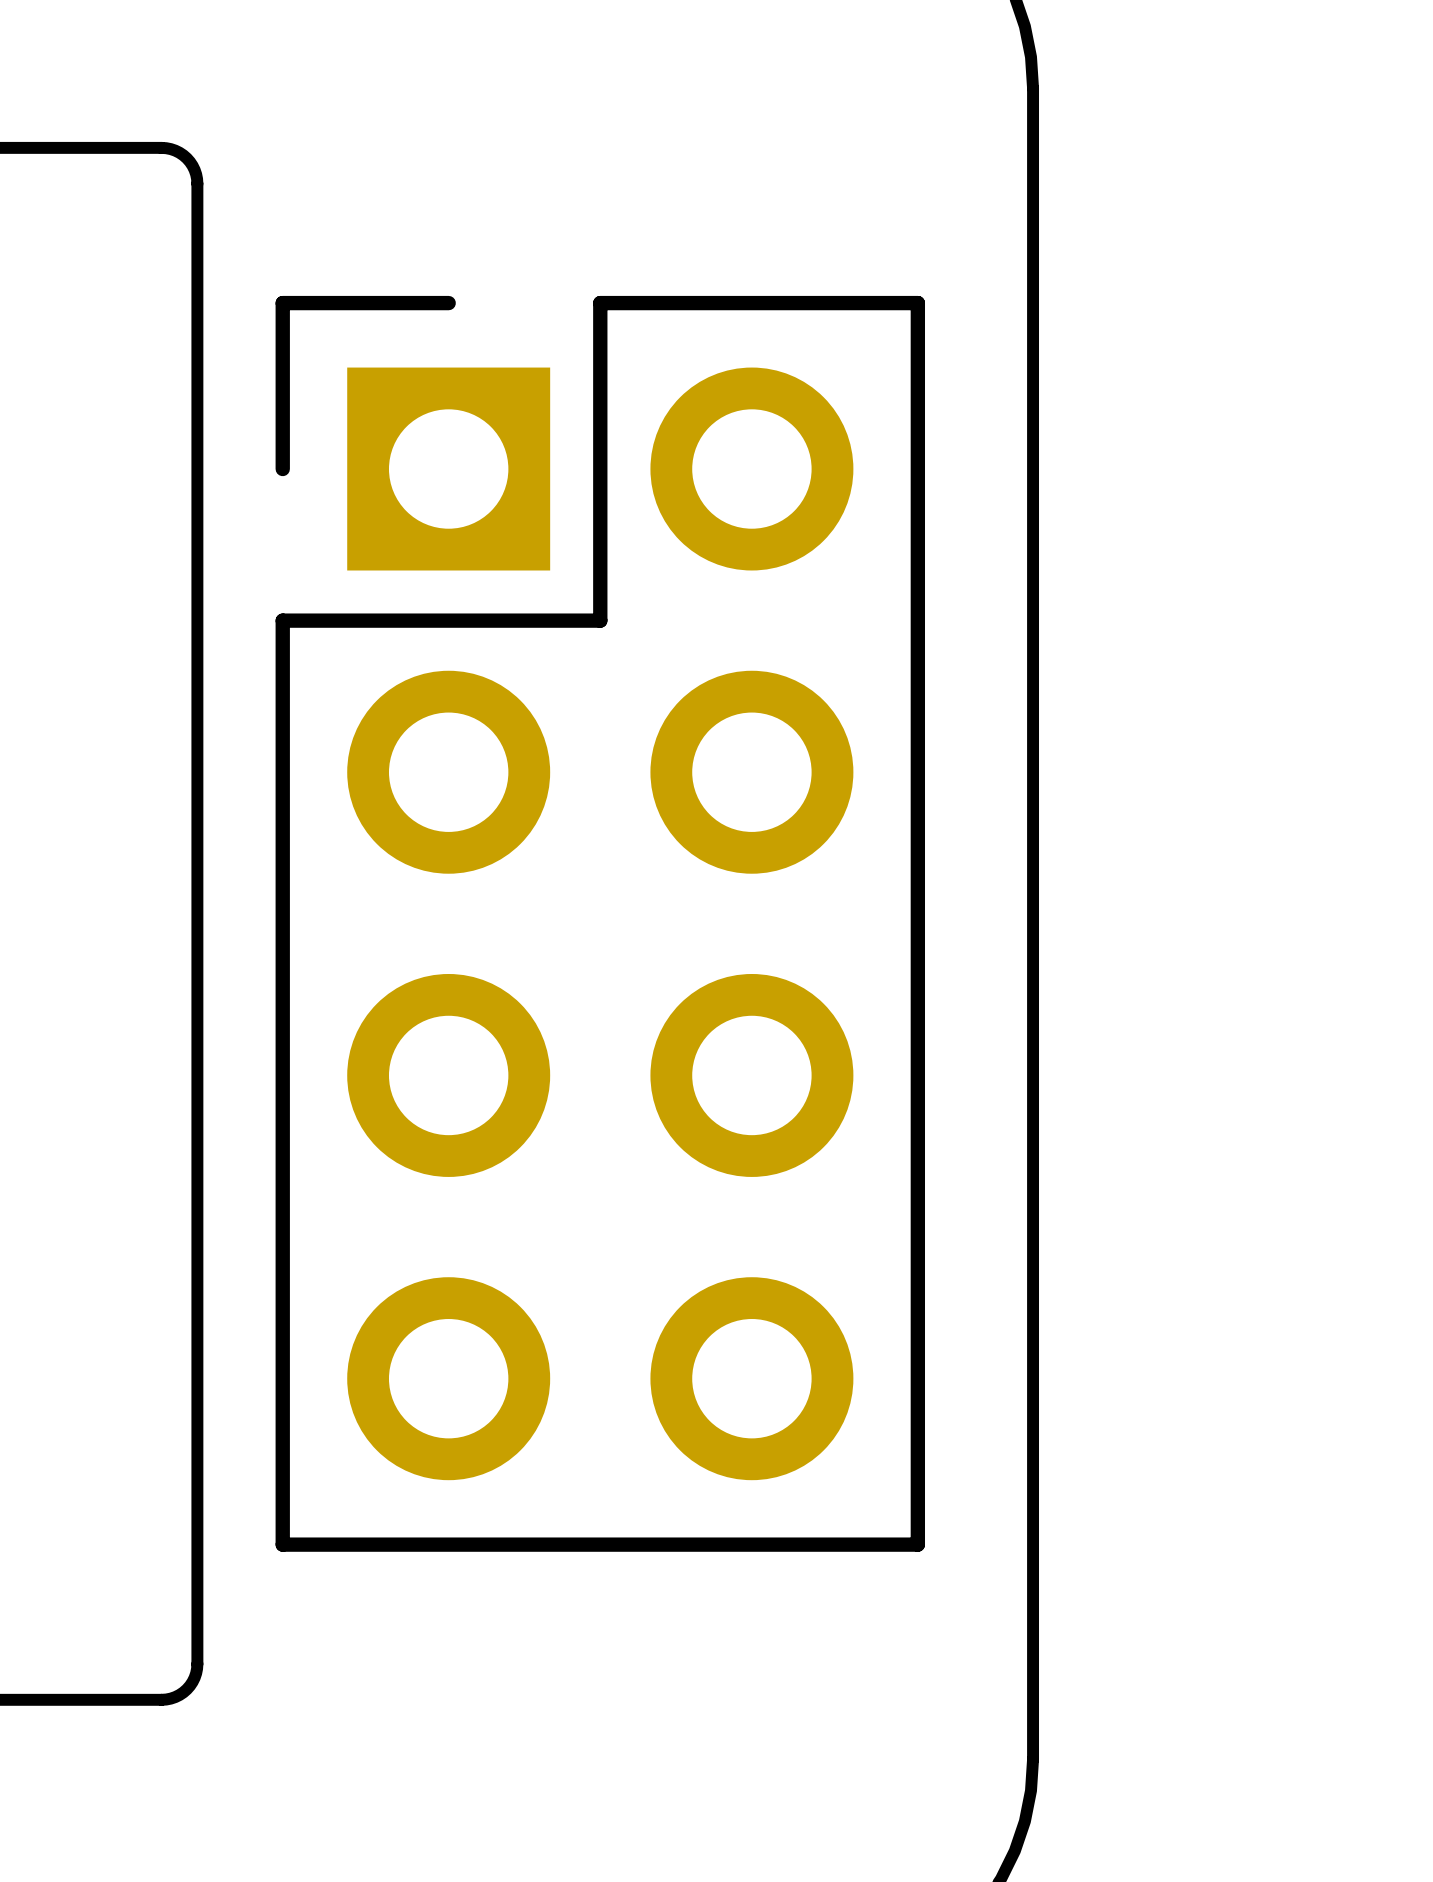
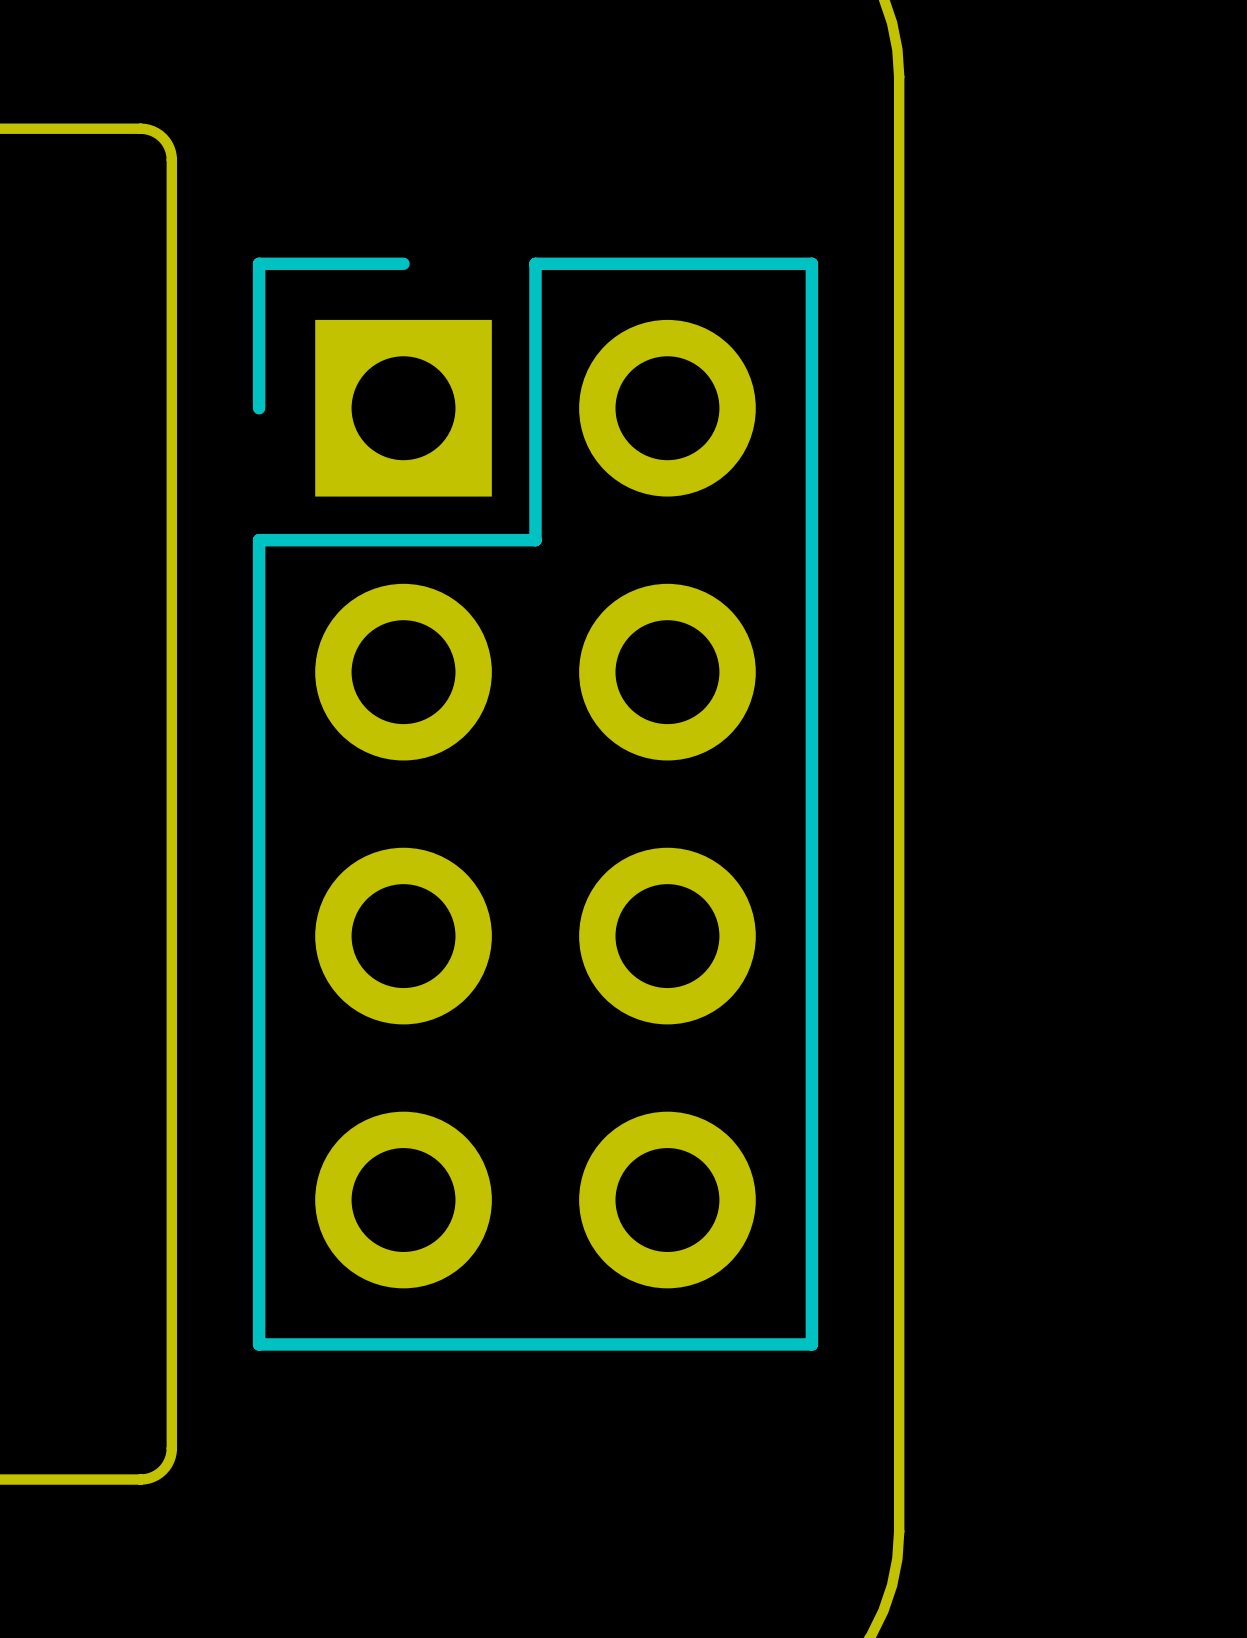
part position: (600, 923) -> (535, 804)

